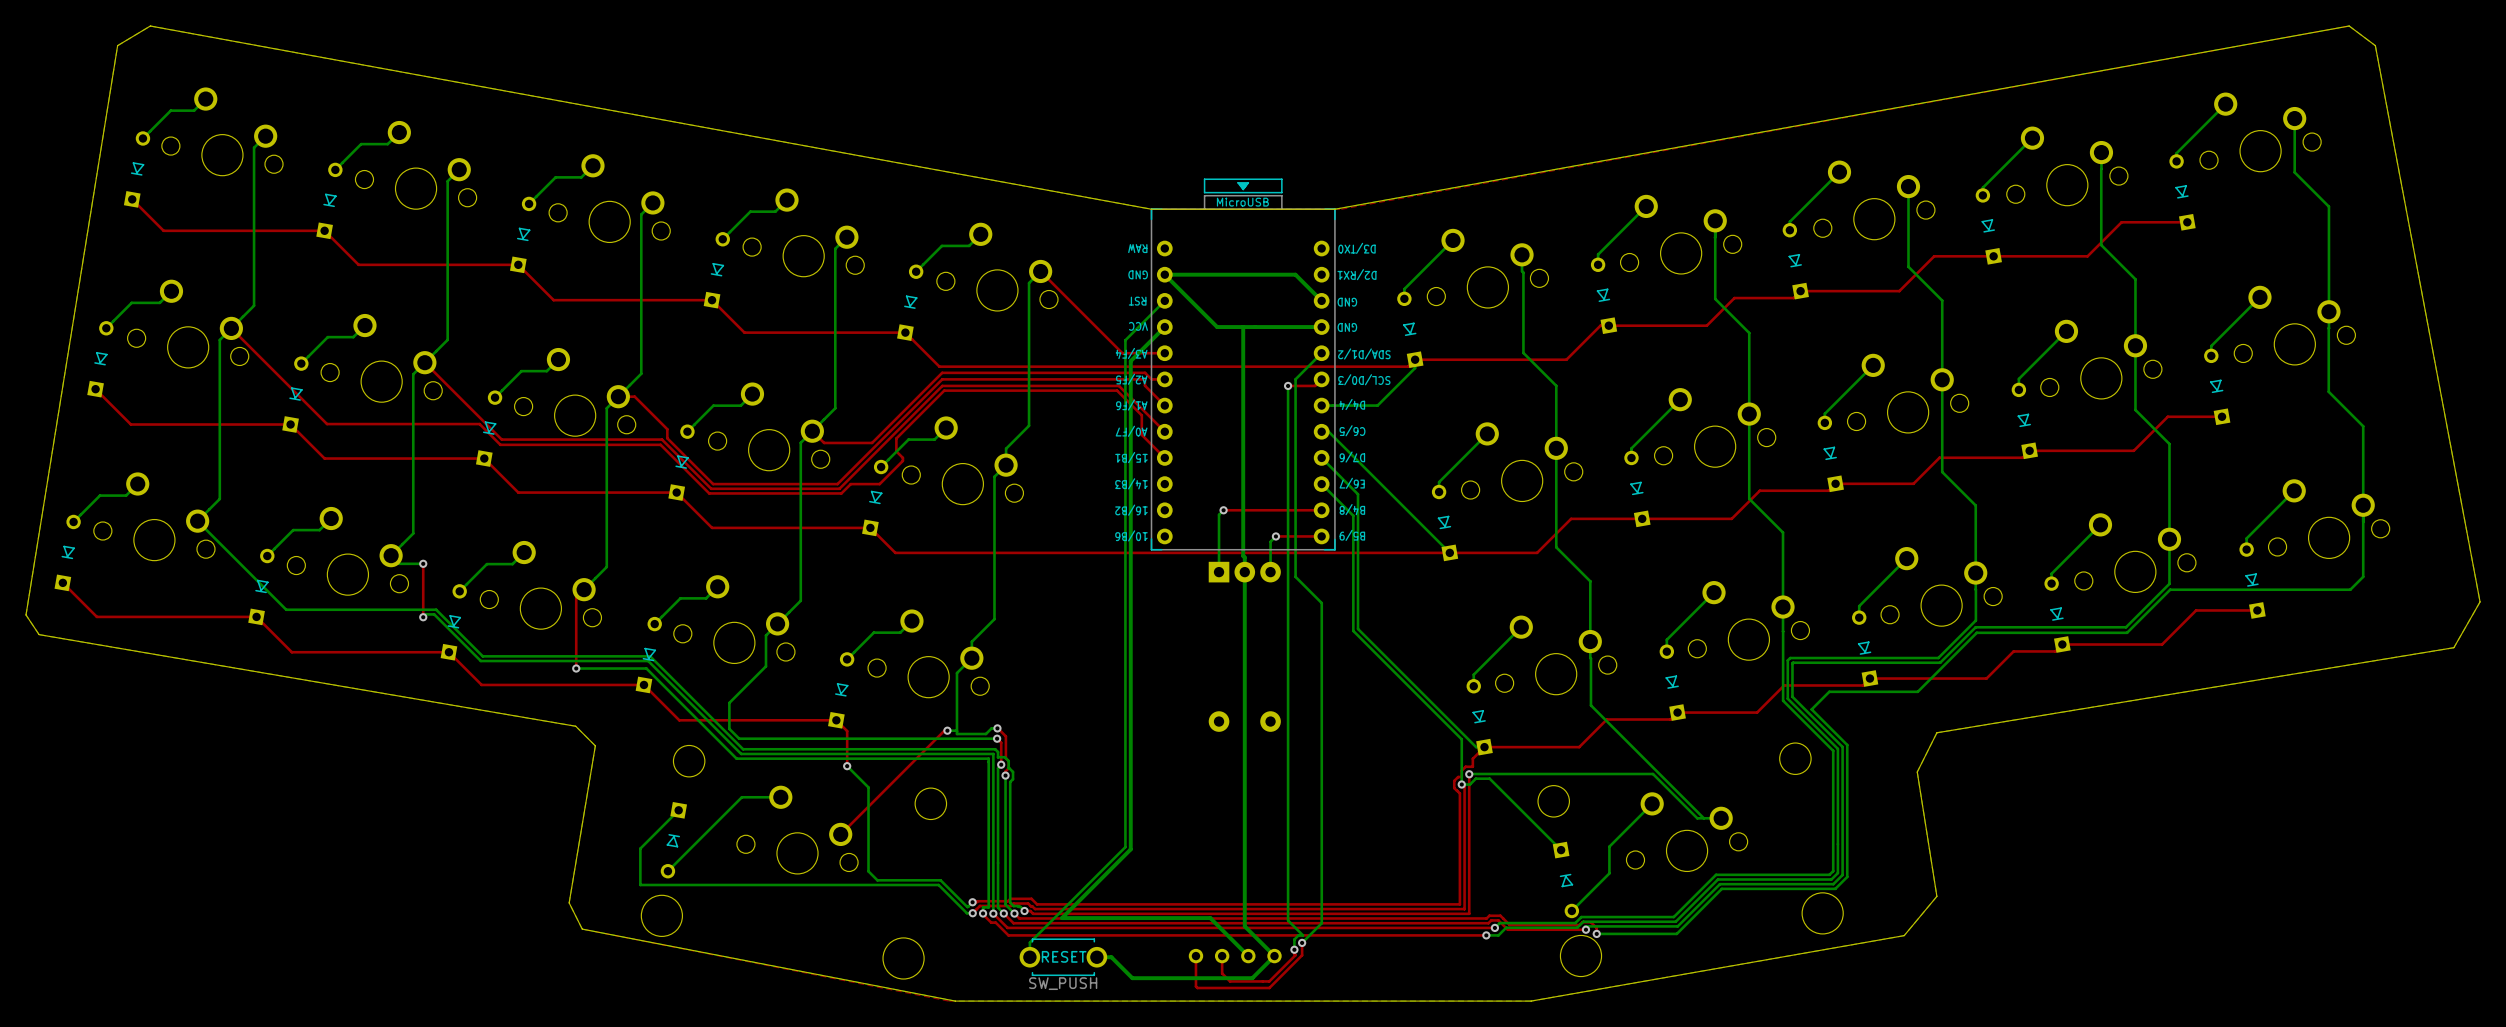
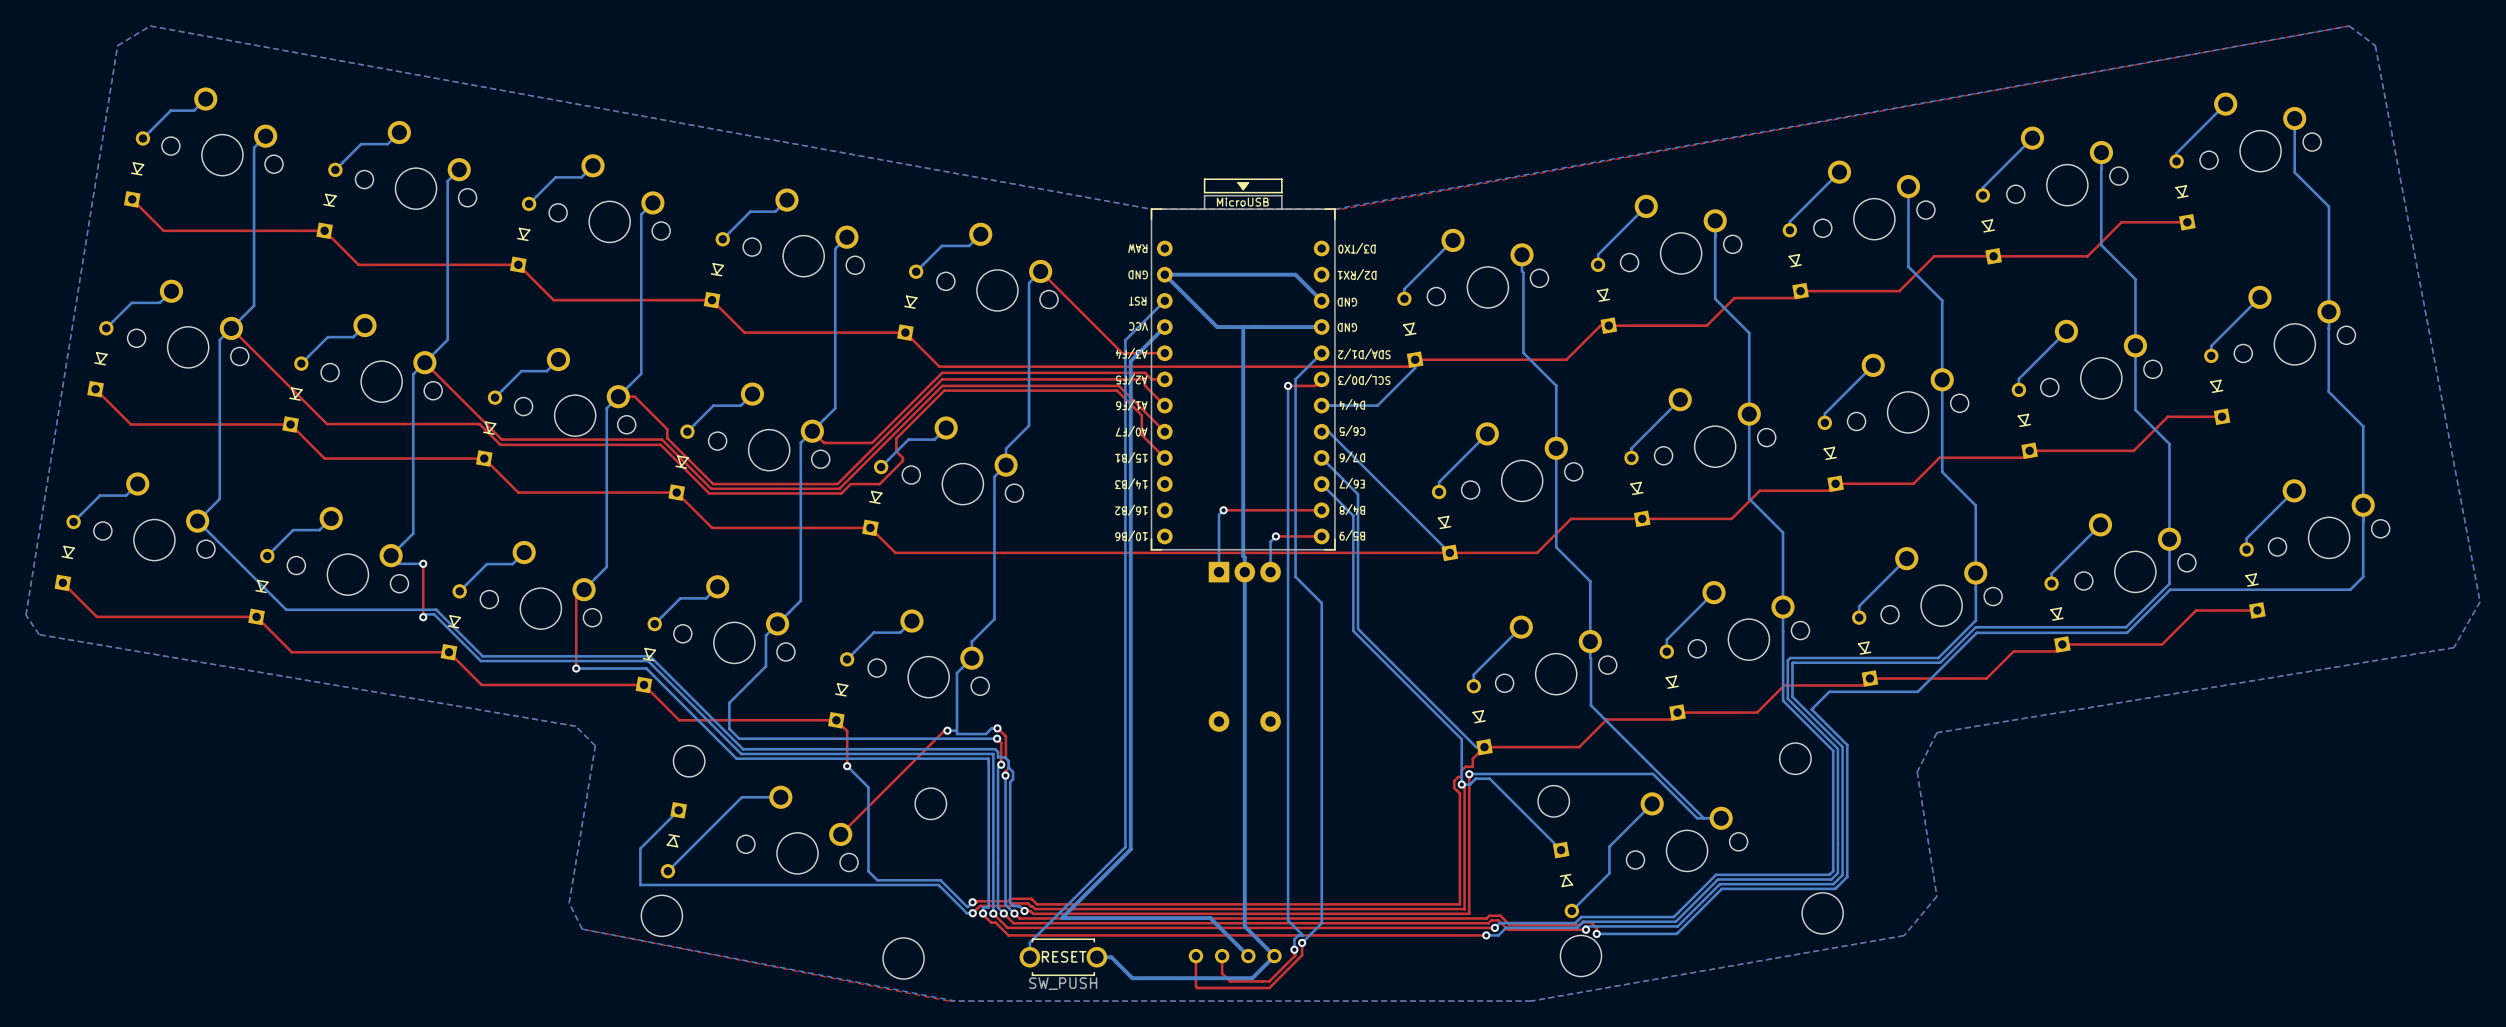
board edge: (2349, 26) (1334, 209) (1151, 209) (150, 26) (117, 45) (26, 614) (39, 634) (575, 726) (595, 745) (569, 902) (582, 929) (955, 1001) (1531, 1001) (1904, 935) (1936, 896) (1917, 772) (1936, 732) (2453, 647) (2480, 601) (2375, 45) (2349, 26) -> none

